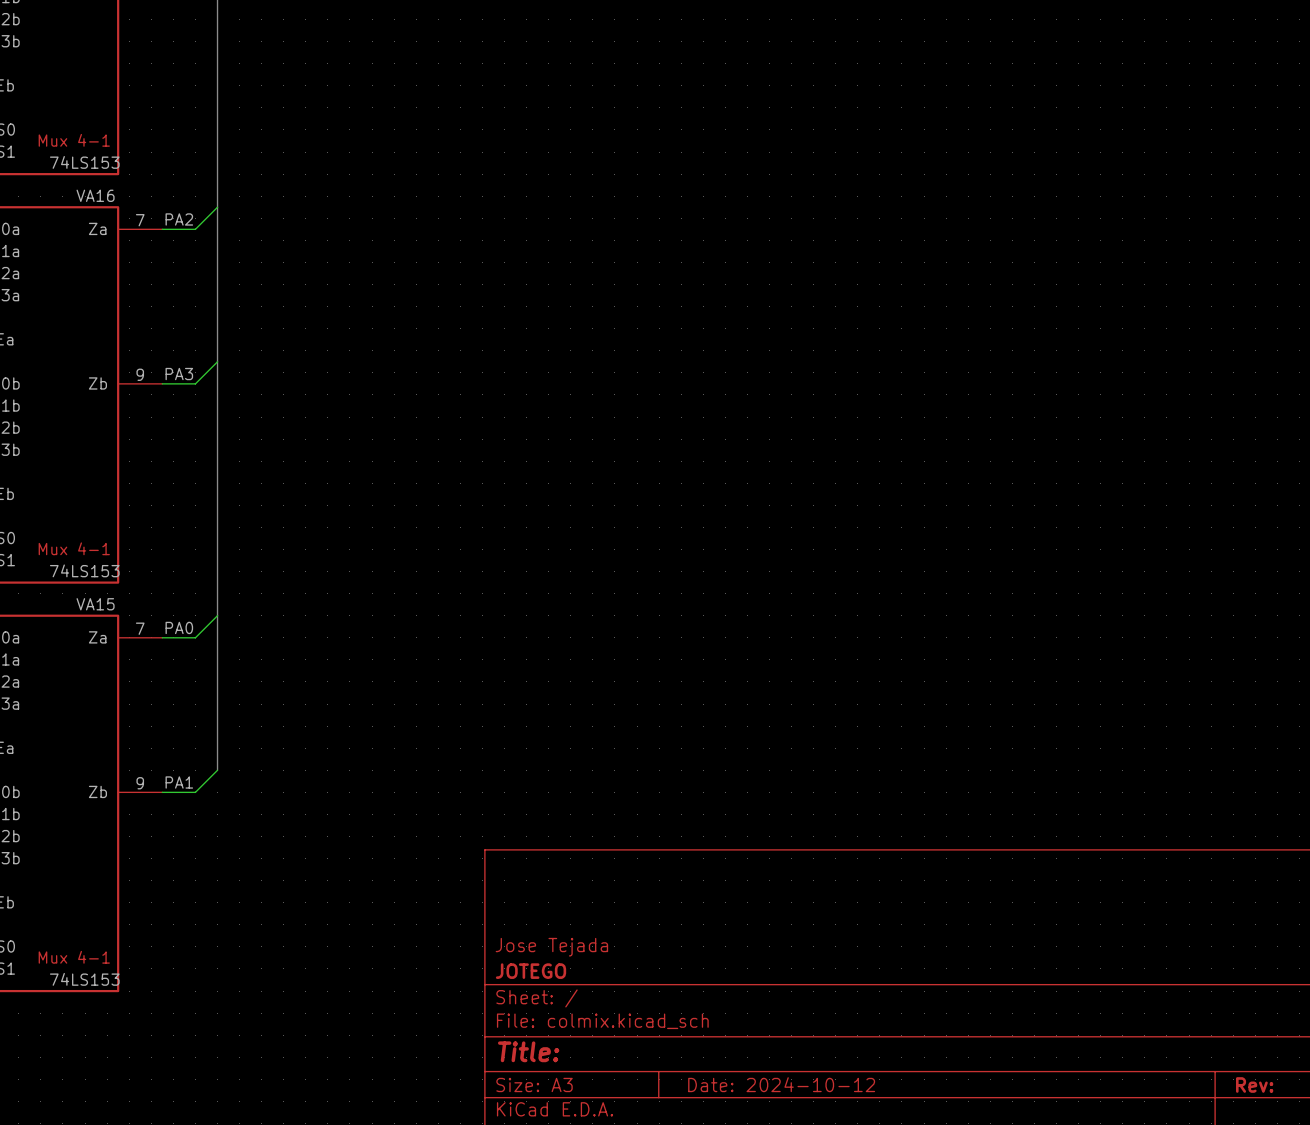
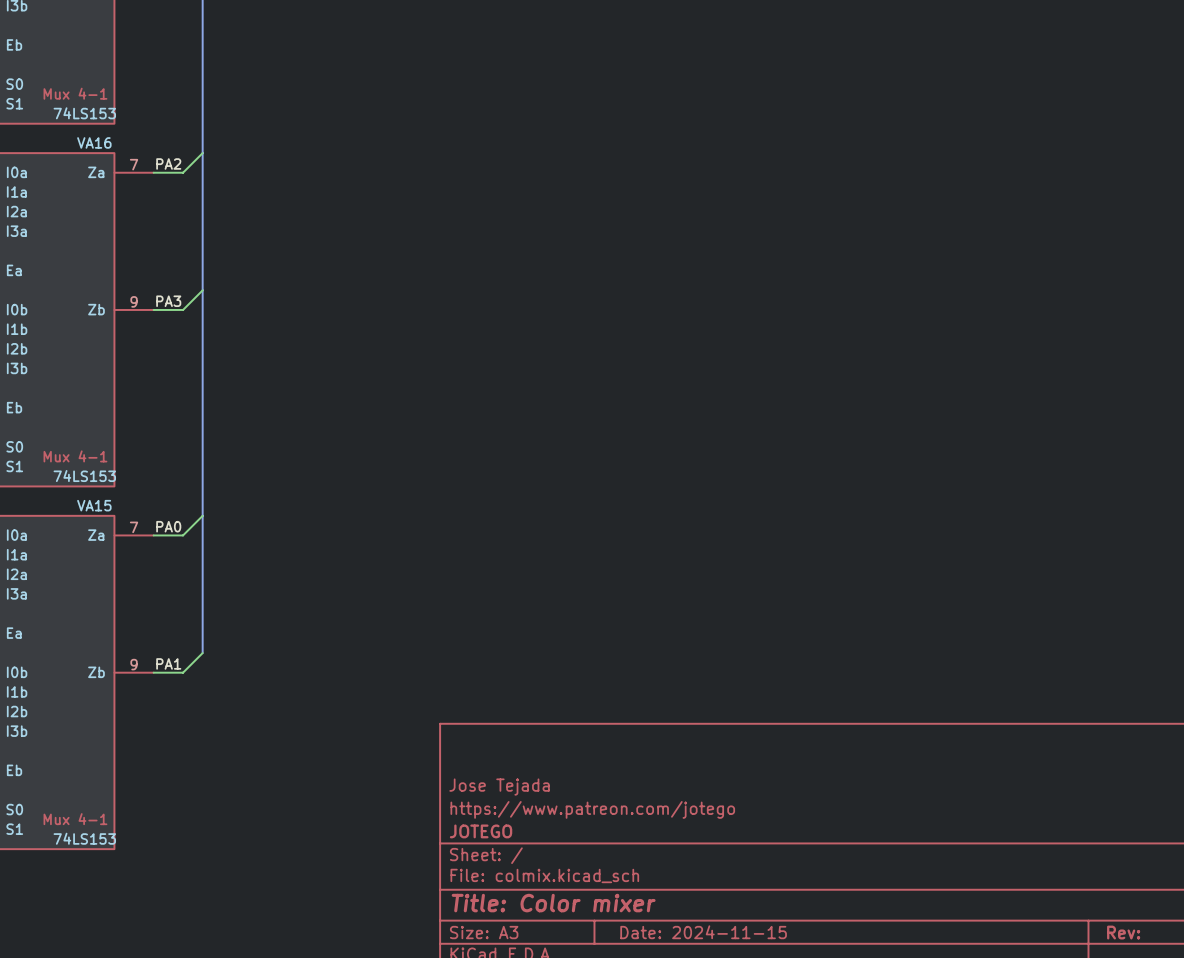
title block: none -> Jose Tejada (499, 787)
title block: Jose Tejada (551, 947) -> https://www.patreon.com/jotego (592, 809)
title block: Title: (528, 1051) -> Title: Color mixer (553, 903)
title block: Date: 2024-10-12 (781, 1084) -> Date: 2024-11-15 (703, 932)

